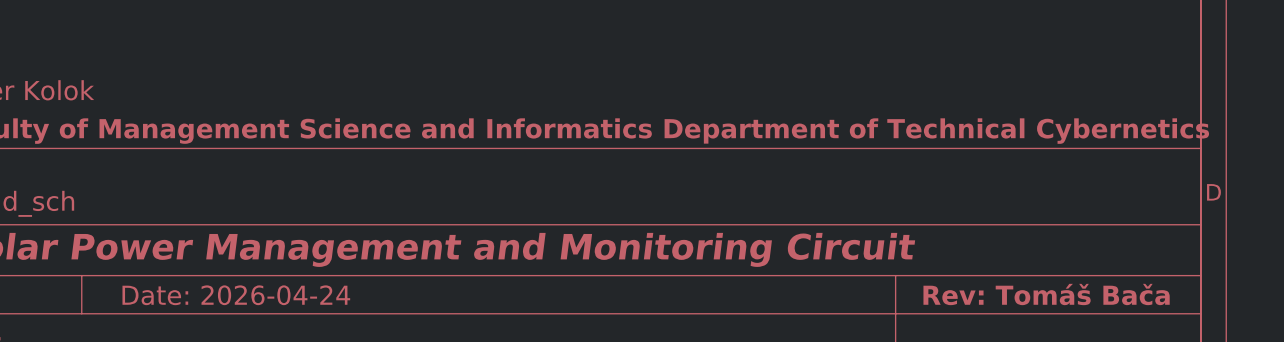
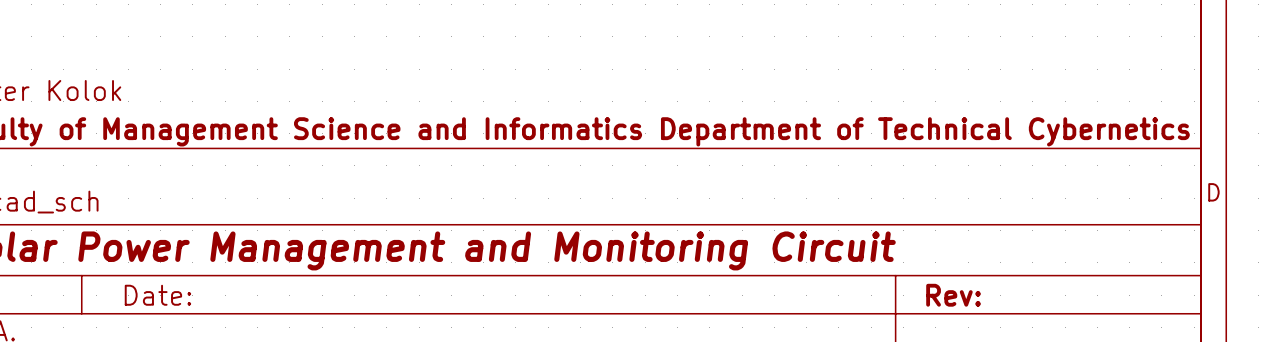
title block: Rev: Tomáš Bača (1046, 294) -> Rev: (953, 295)
title block: Date: 2026-04-24 (236, 295) -> Date: (157, 295)

